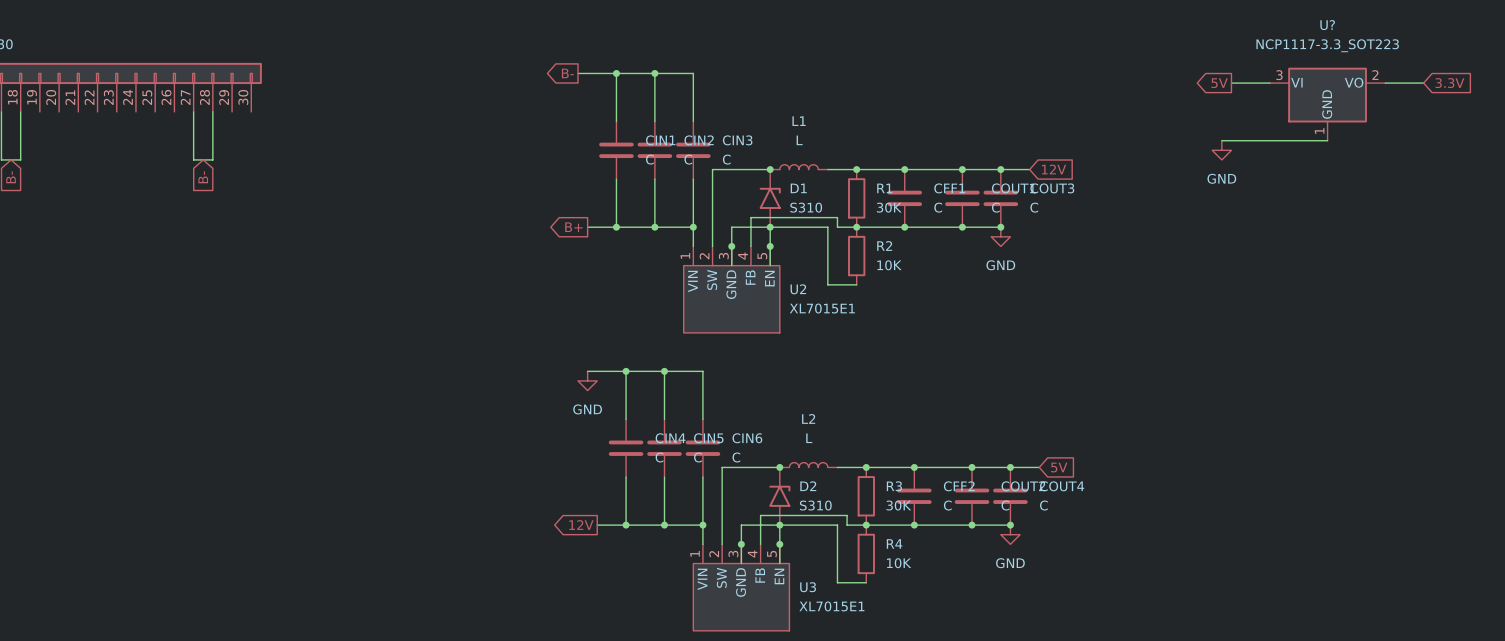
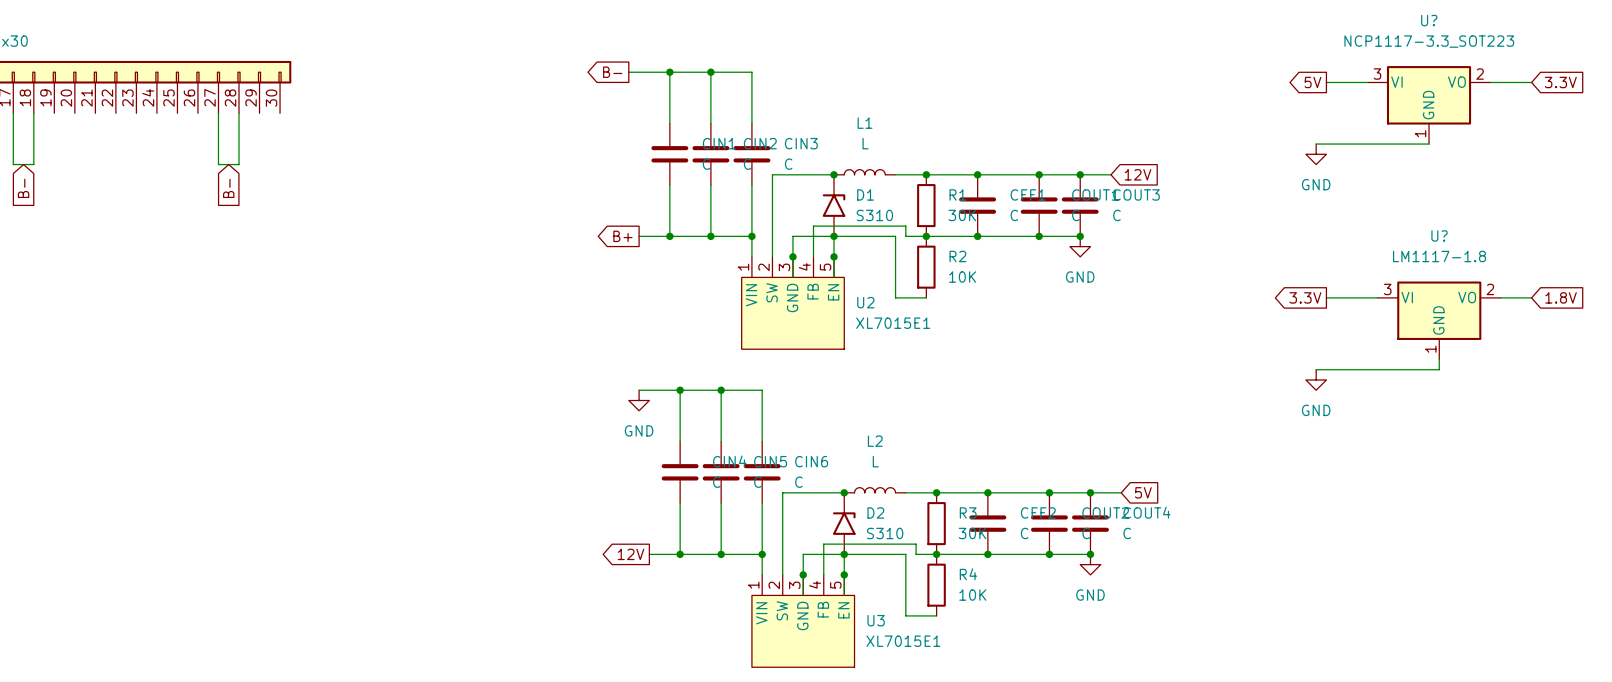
global label: none -> 3.3V (1305, 297)
wire: none -> (1326, 297) (1377, 297)
wire: none -> (1500, 297) (1531, 297)
global label: none -> 1.8V (1561, 297)
U?: none -> LM1117-1.8 (1439, 320)
wire: none -> (1439, 359) (1439, 369) (1316, 369)
power symbol: none -> GND (1316, 379)

